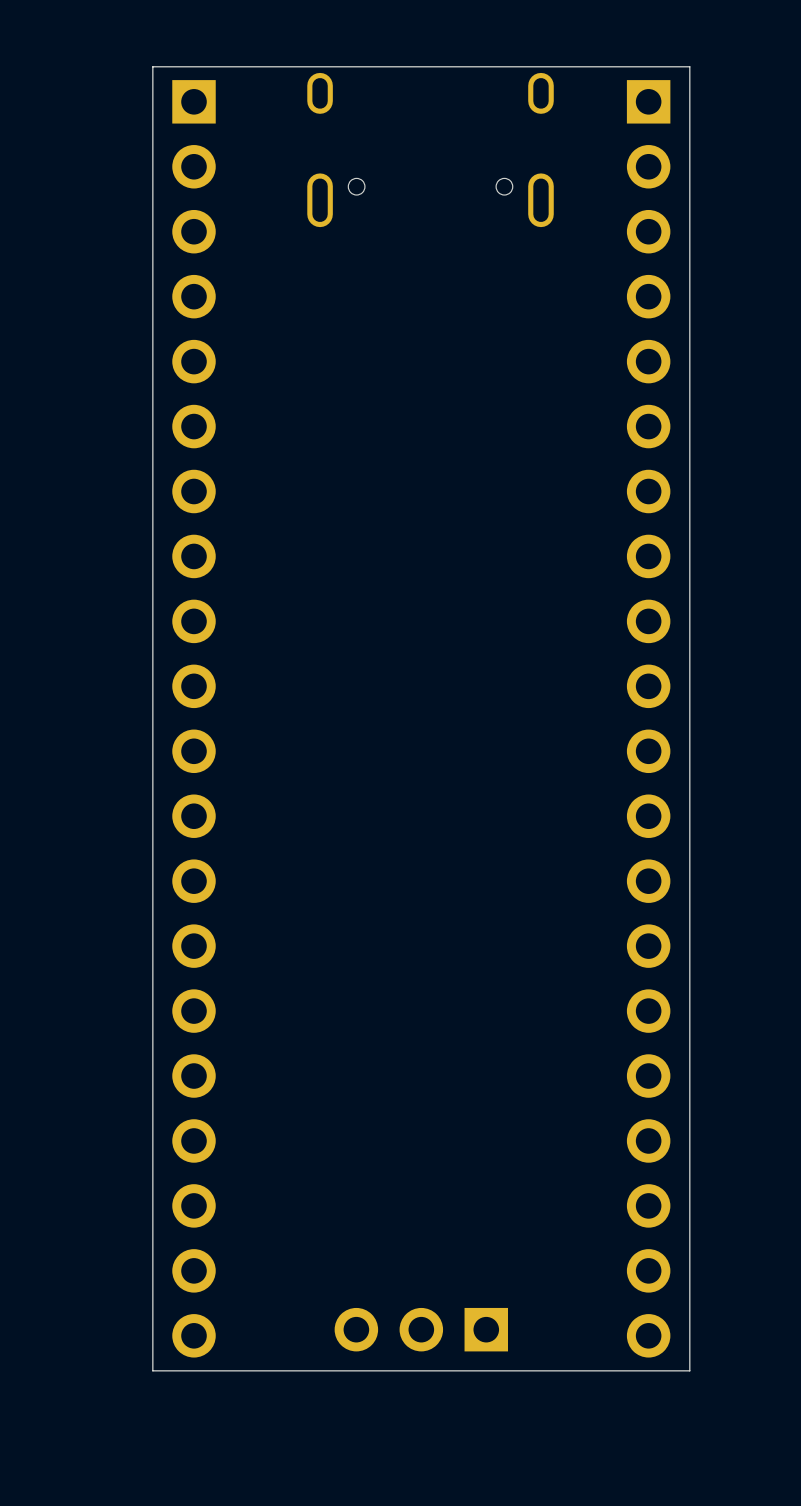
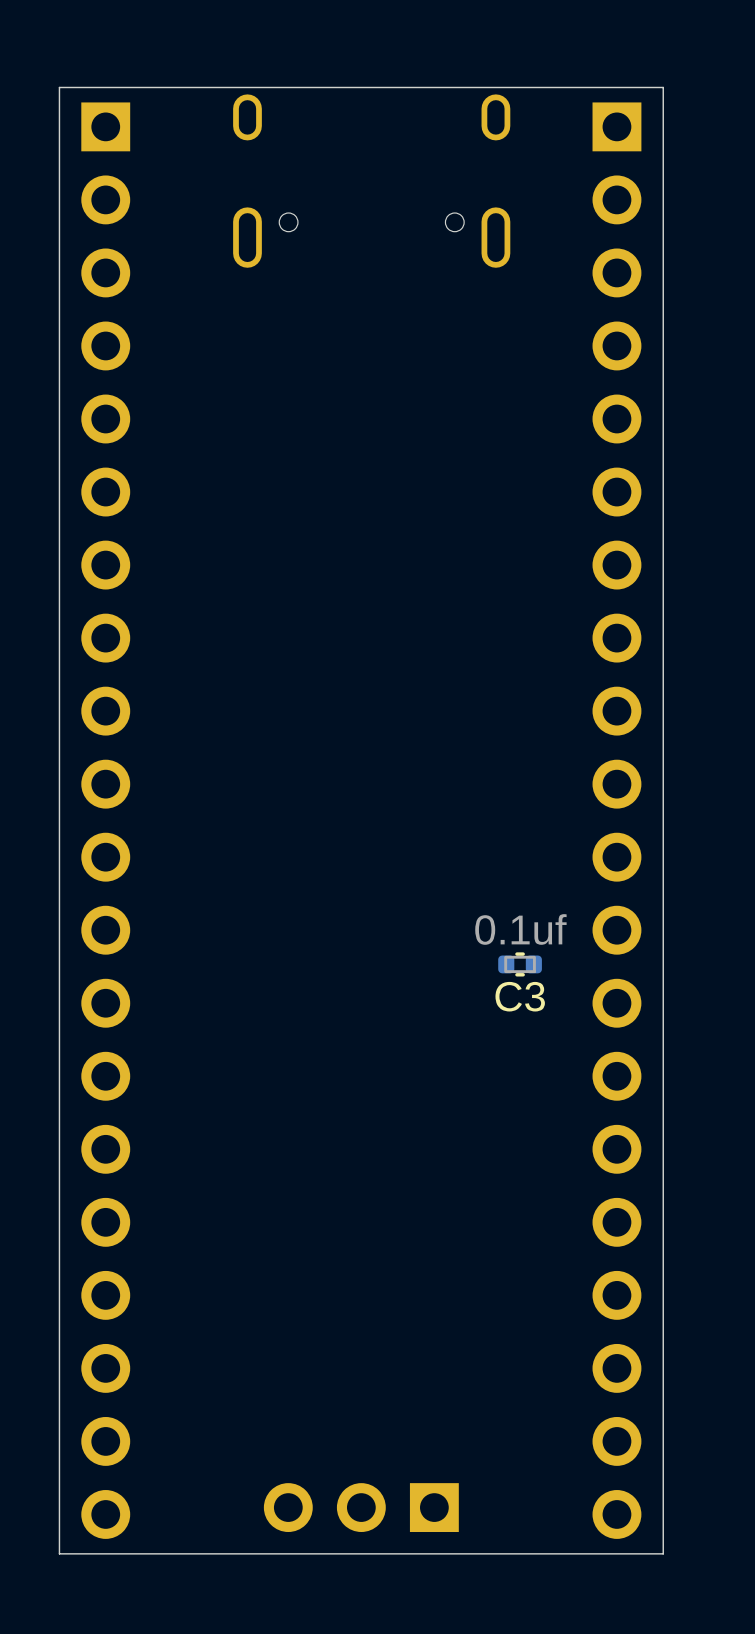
C3: none -> 0.1uf (520, 964)

